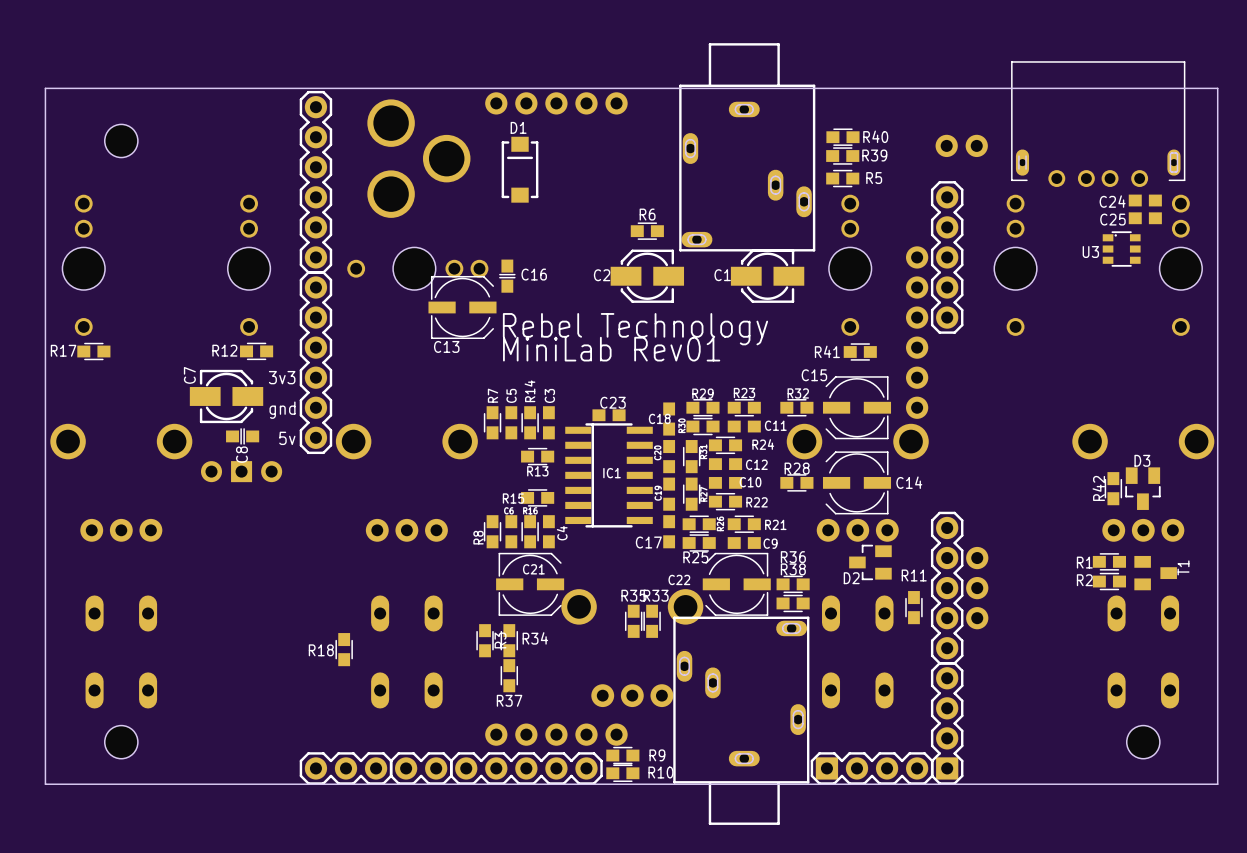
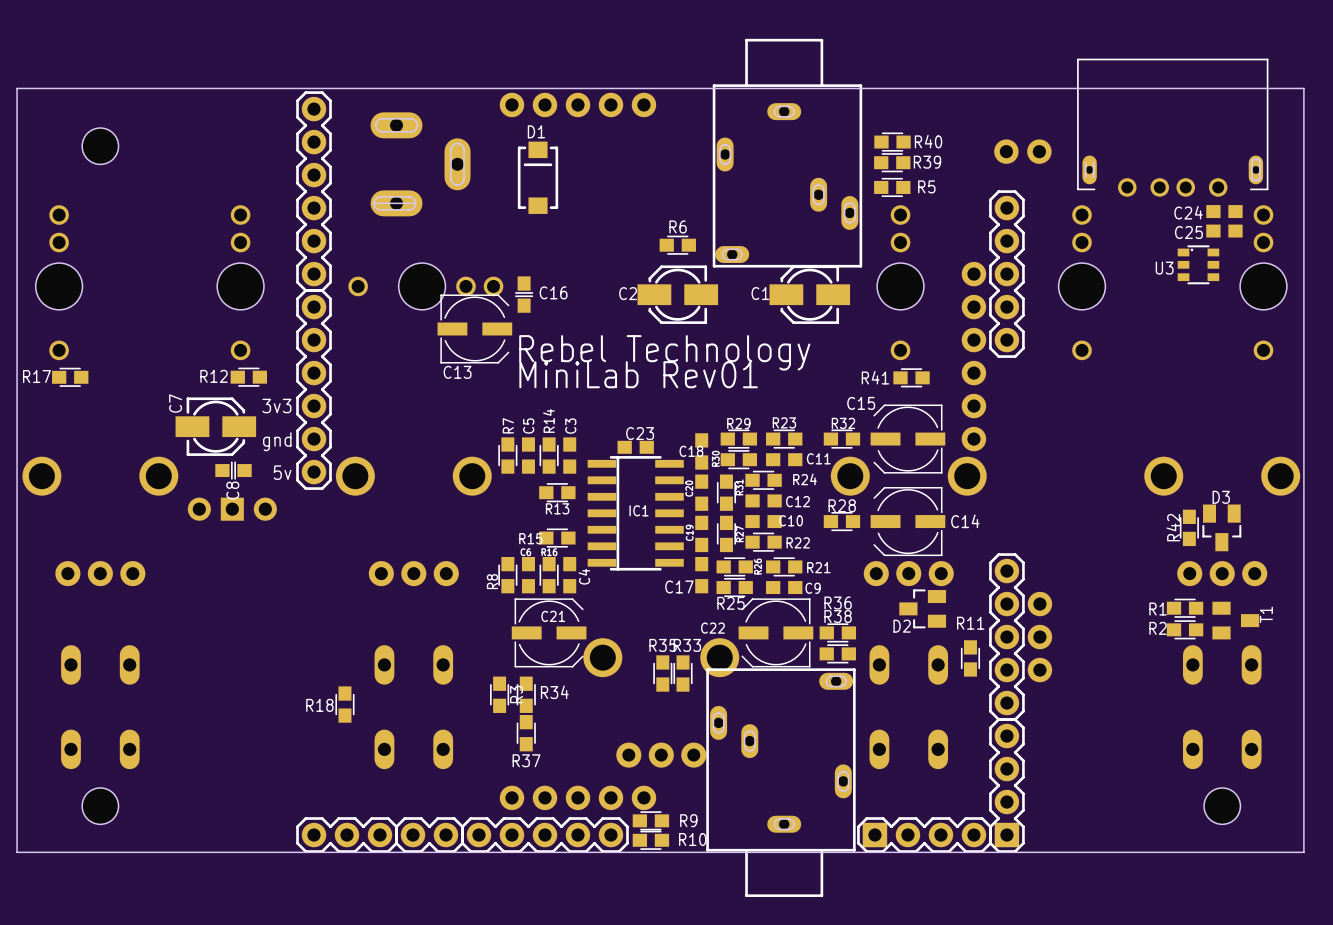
part footprint: [367, 99, 471, 218] -> [370, 112, 471, 217]

